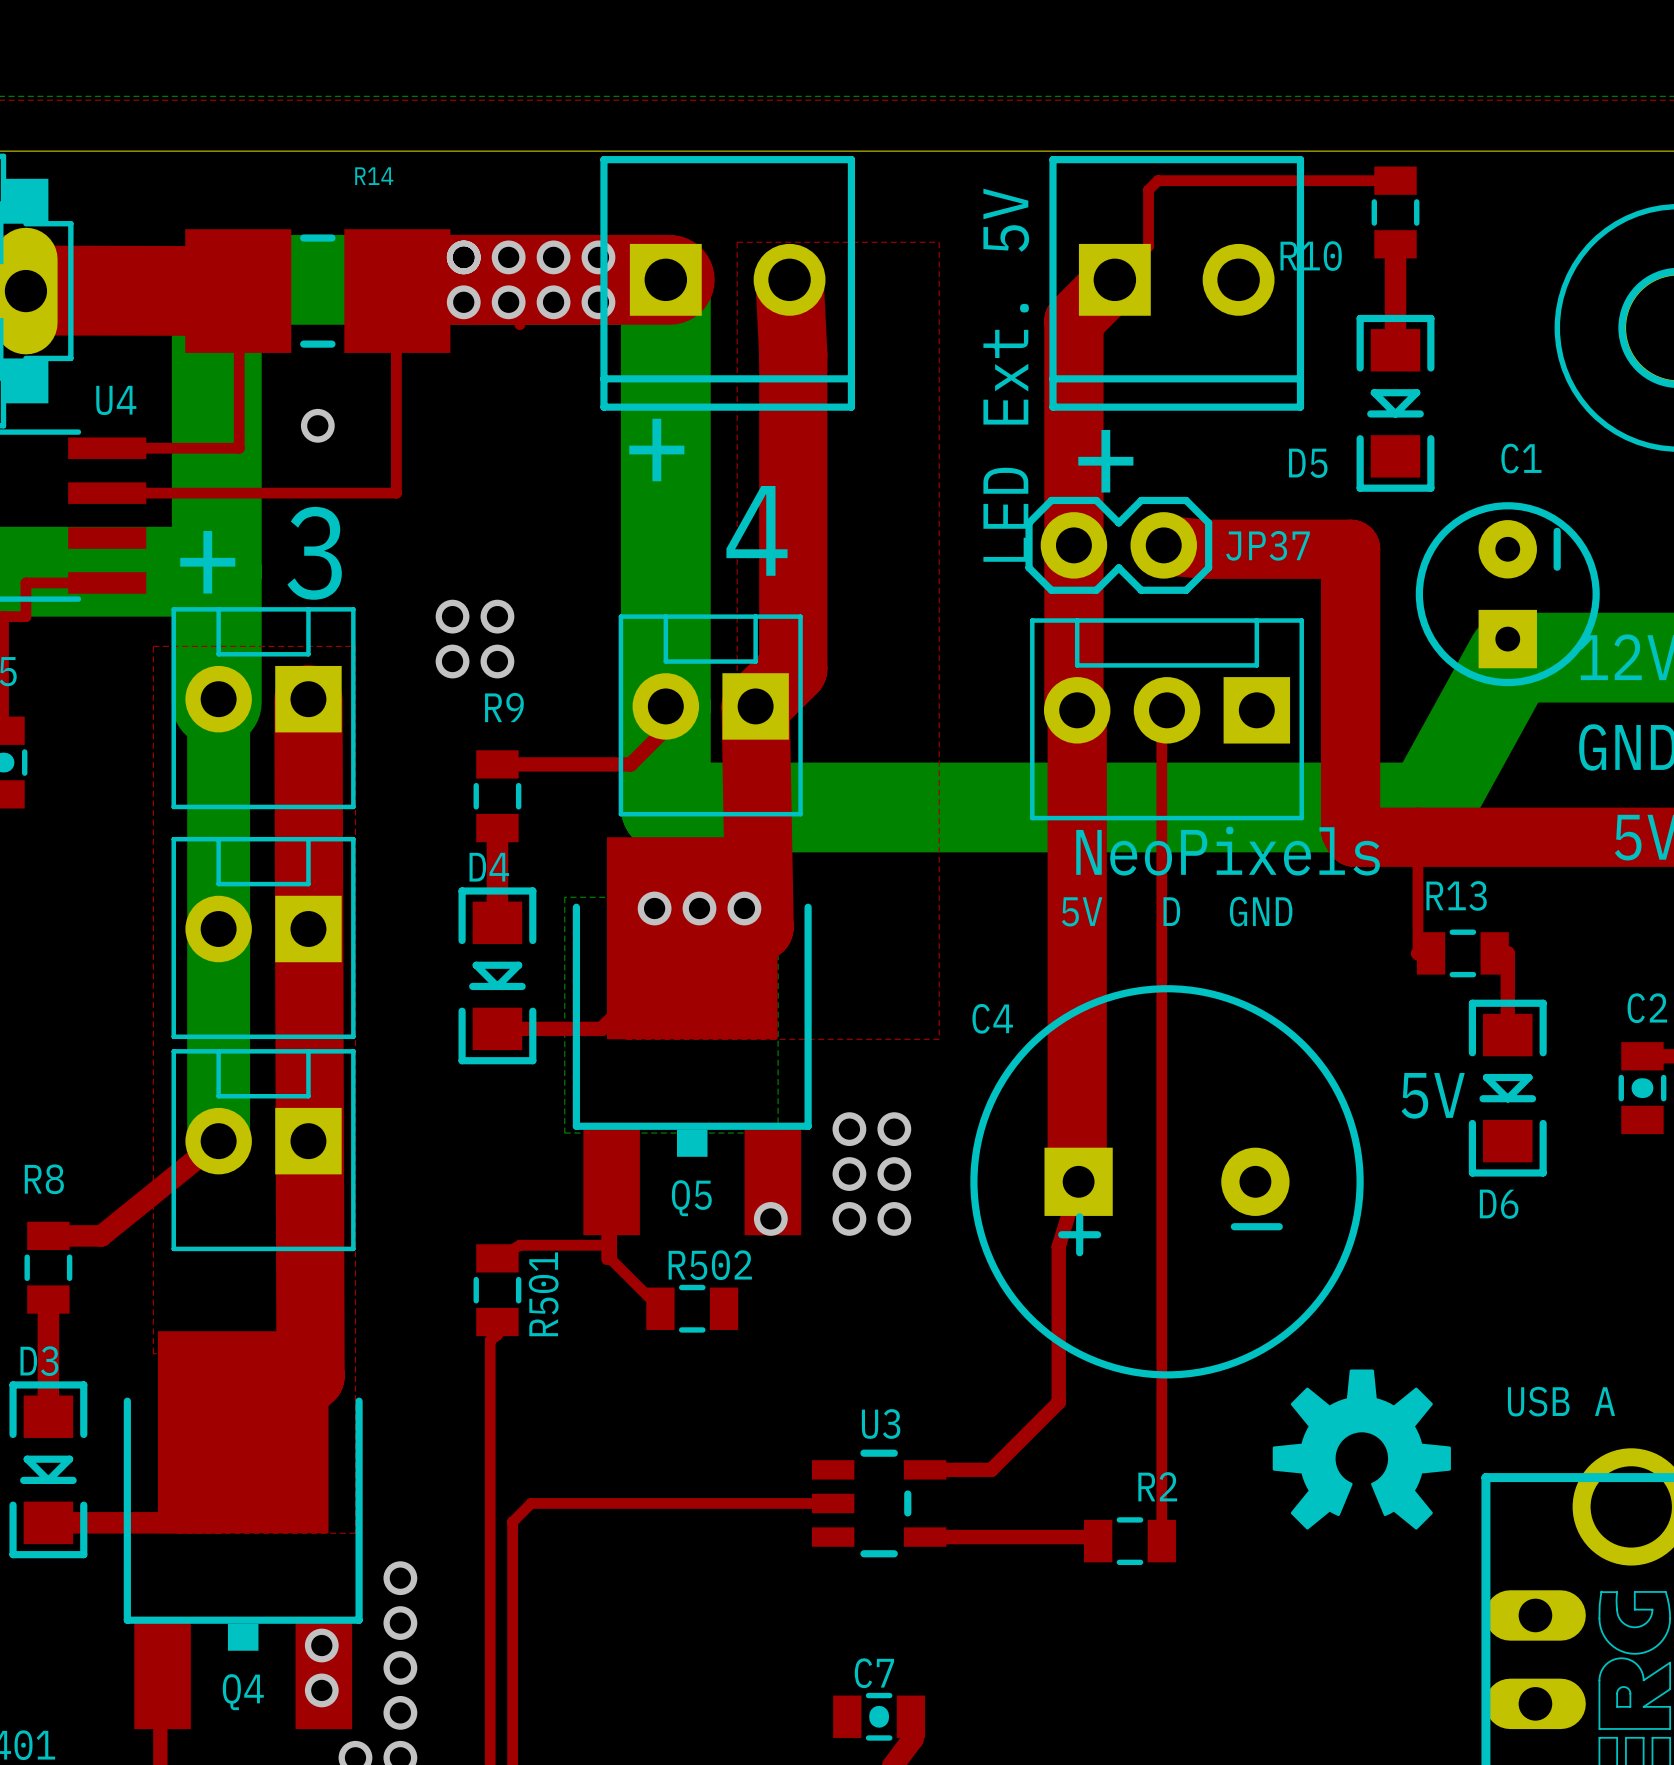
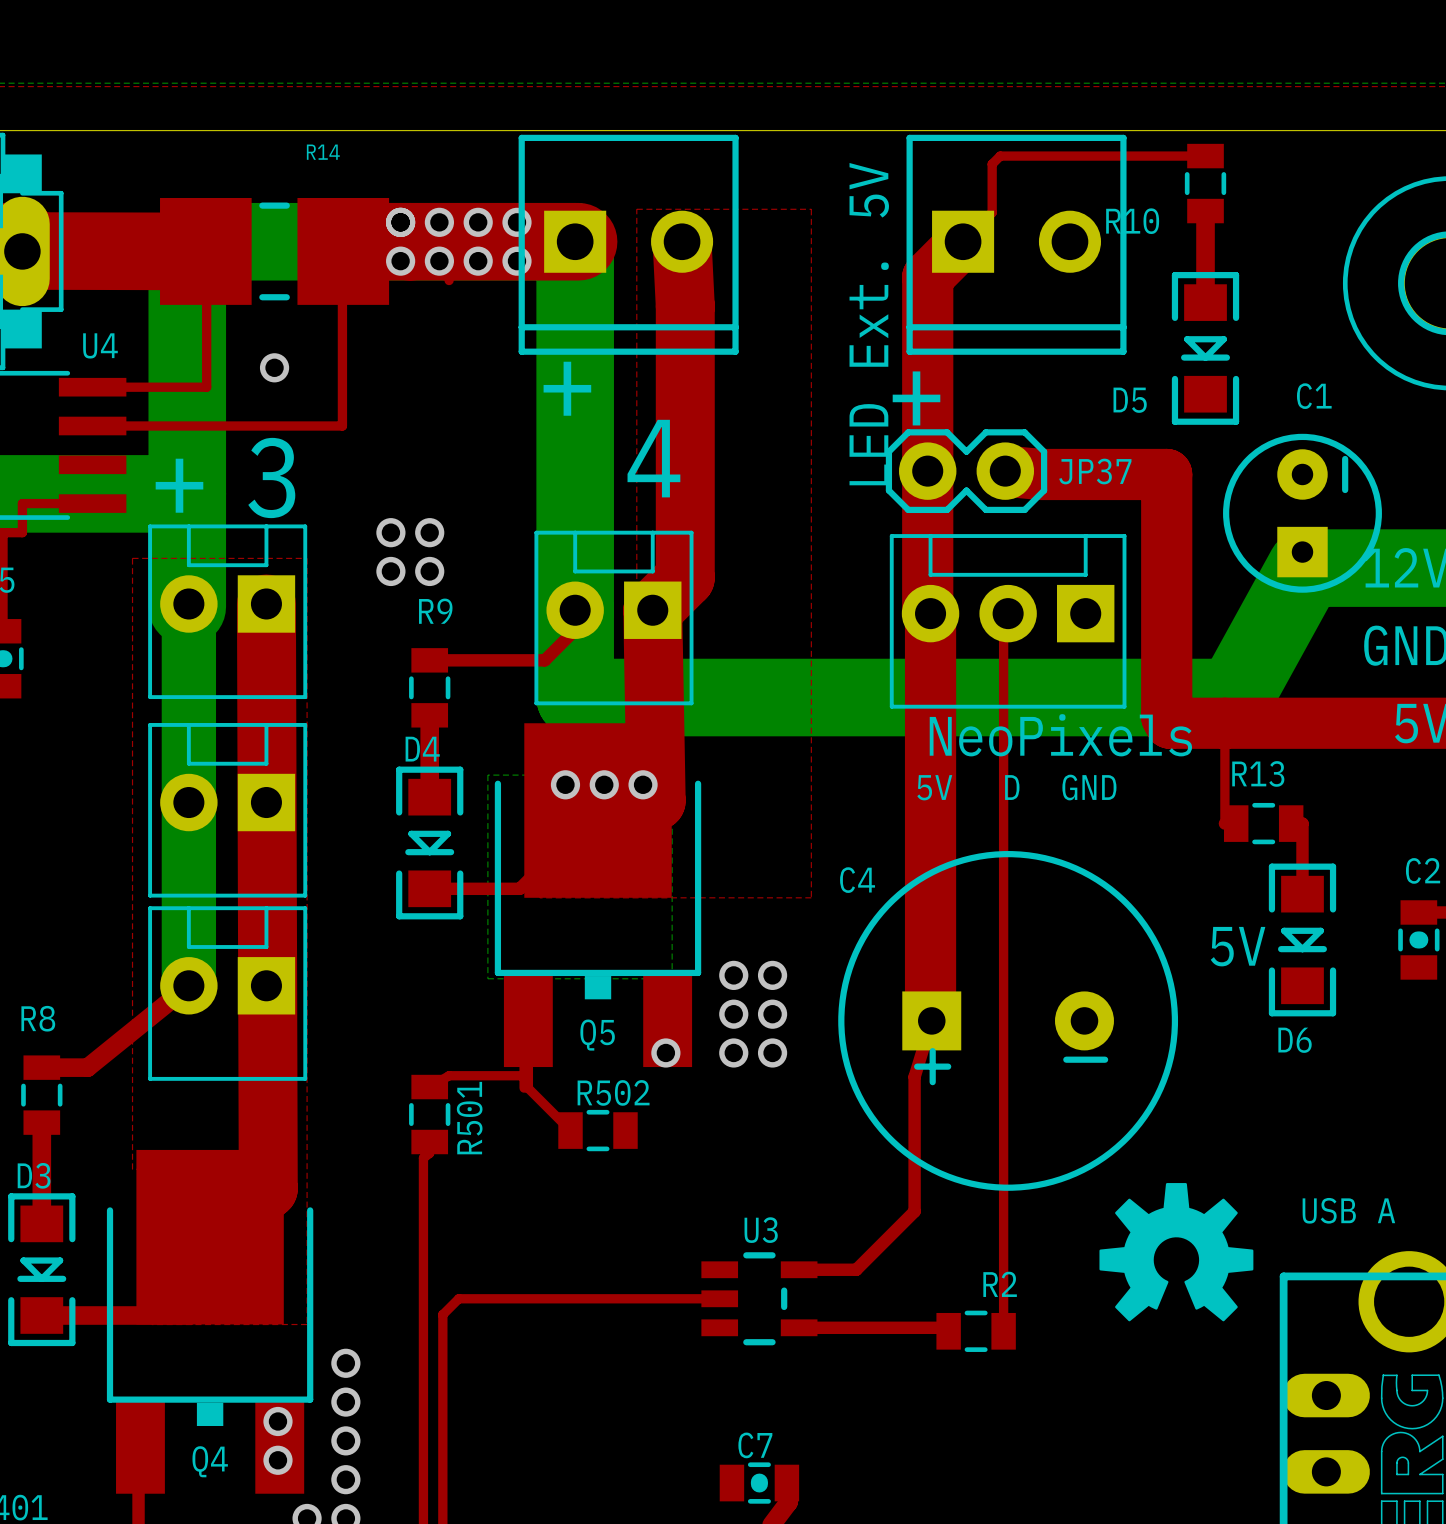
text position: + (1105, 461) -> + (916, 398)

